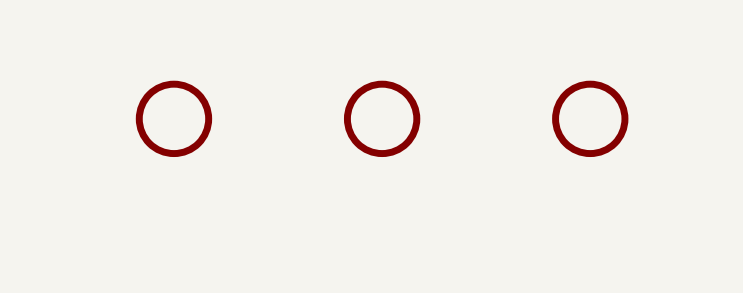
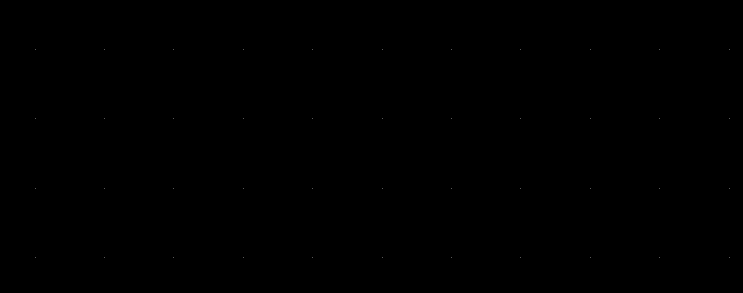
part: (173, 118) -> none
part: (382, 118) -> none
part: (590, 118) -> none

